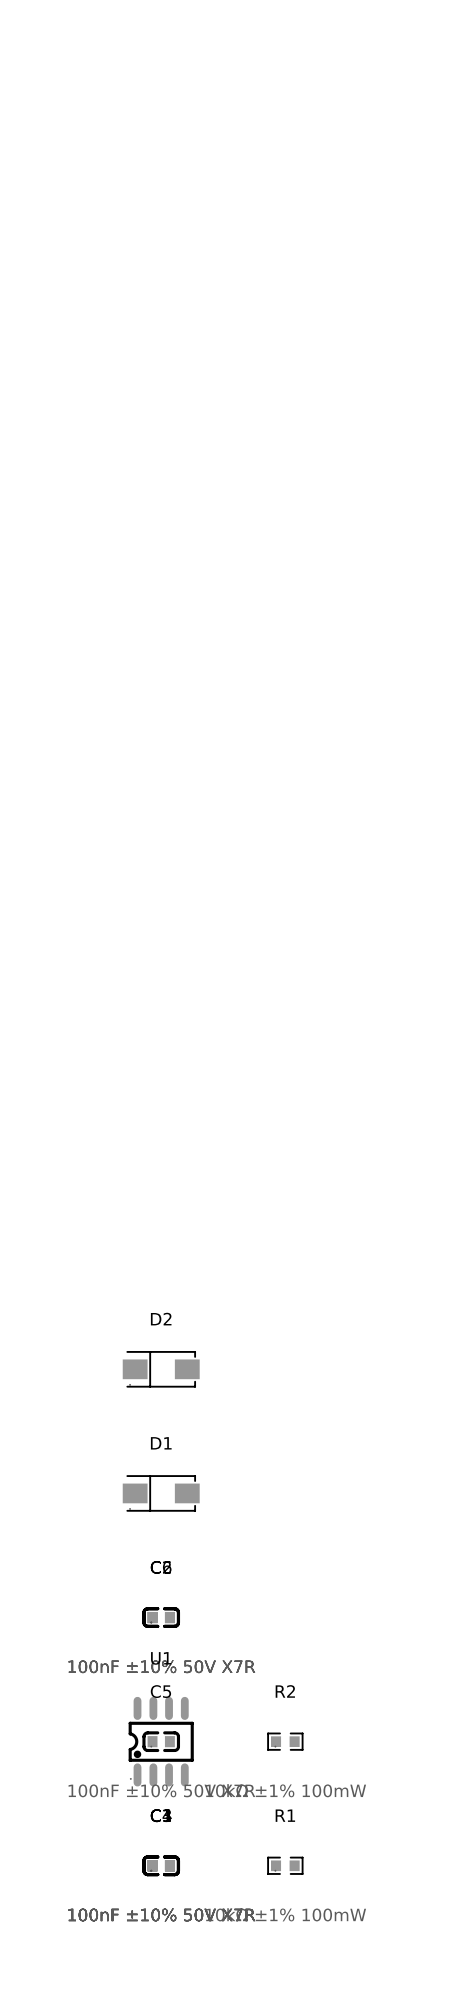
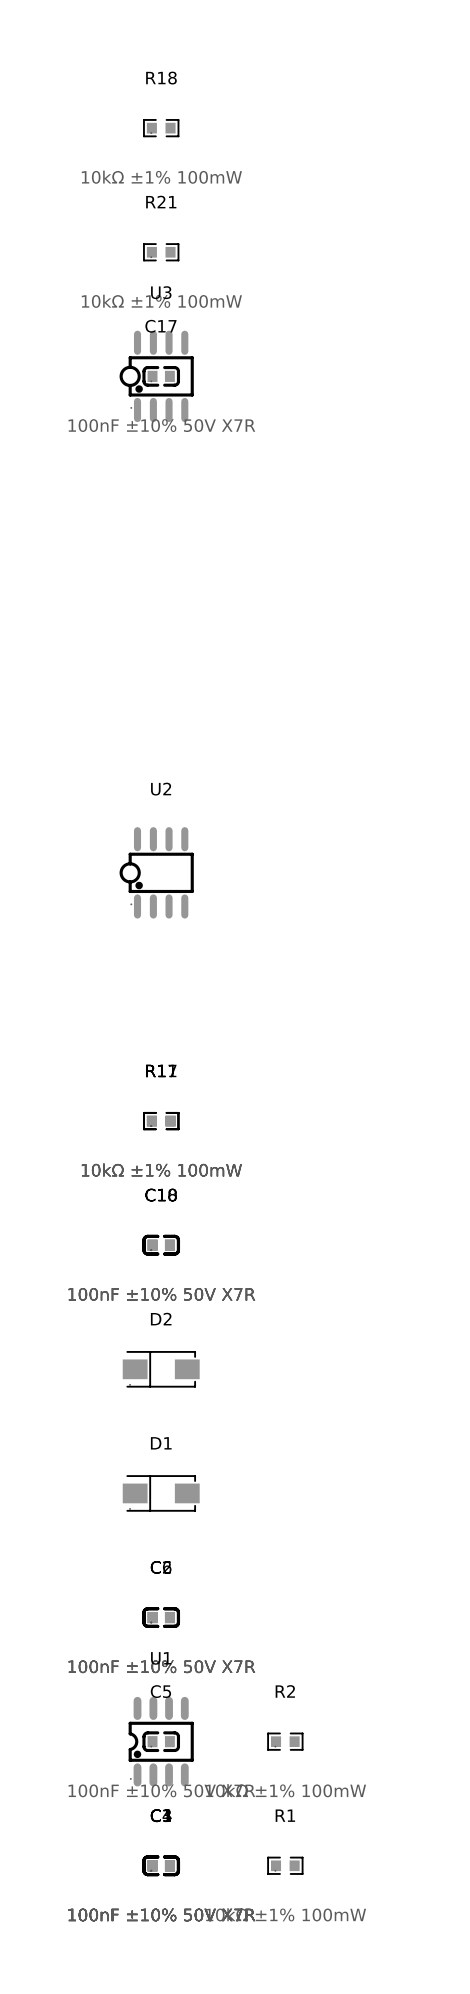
R18: none -> 10kΩ ±1% 100mW (161, 128)
R21: none -> 10kΩ ±1% 100mW (161, 252)
U3: none -> (156, 376)
C17: none -> 100nF ±10% 50V X7R (161, 376)
U2: none -> (156, 872)
part: none -> 10kΩ ±1% 100mW (161, 1121)
part: none -> 10kΩ ±1% 100mW (161, 1121)
part: none -> 100nF ±10% 50V X7R (161, 1245)
part: none -> 100nF ±10% 50V X7R (161, 1245)

